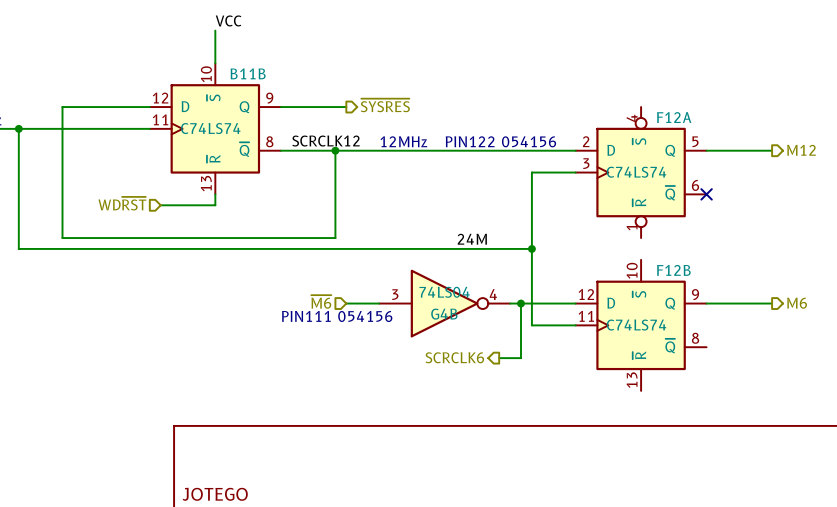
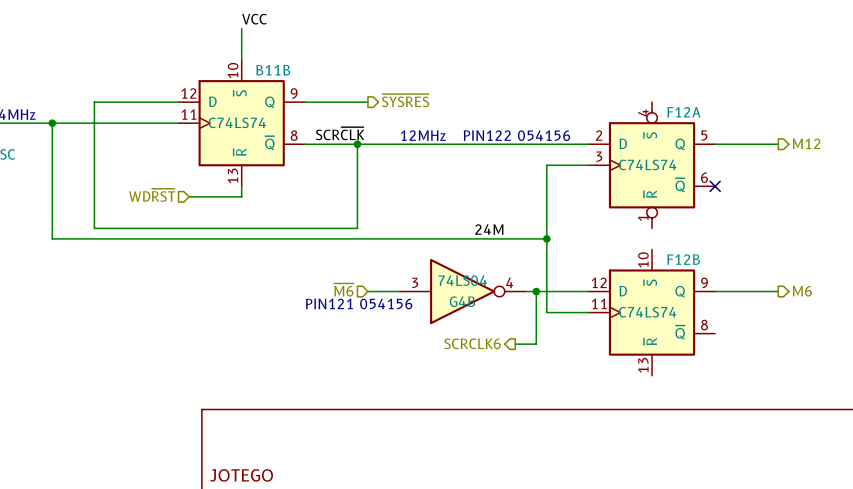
label: SCRCLK12 (326, 141) -> SCR~{CLK} (340, 133)
text: PIN111 054156 (337, 316) -> PIN121 054156 (359, 304)

